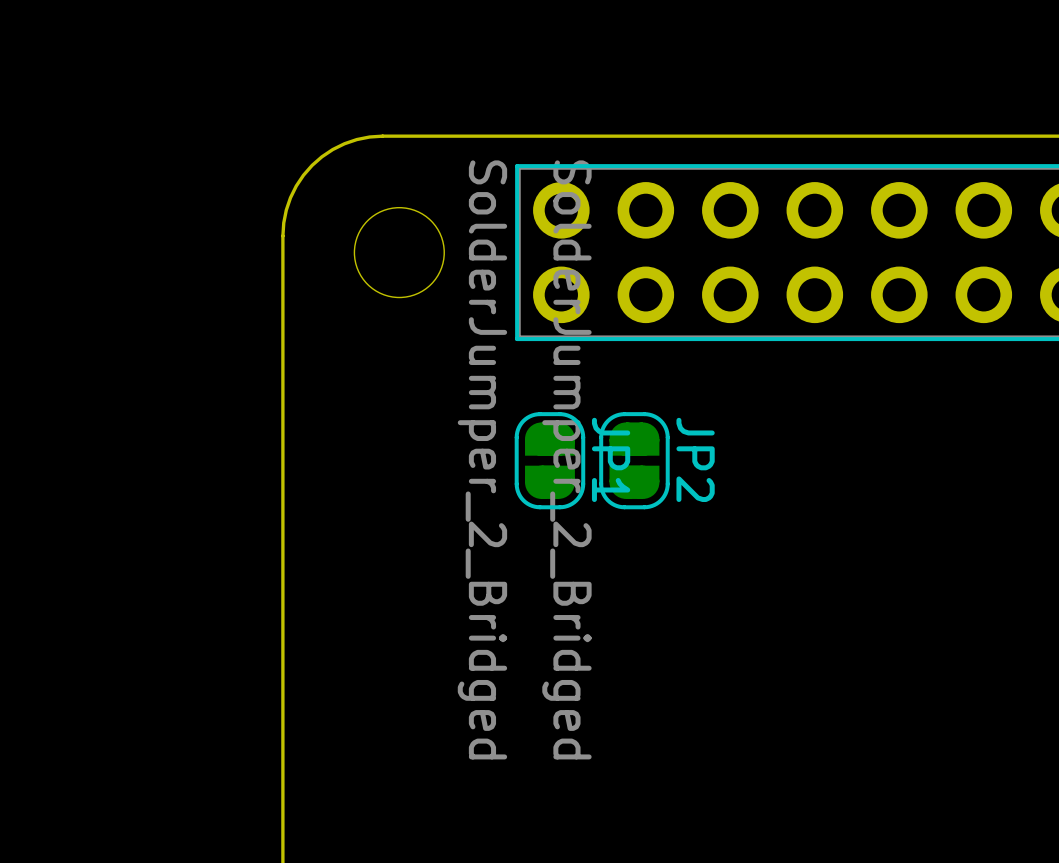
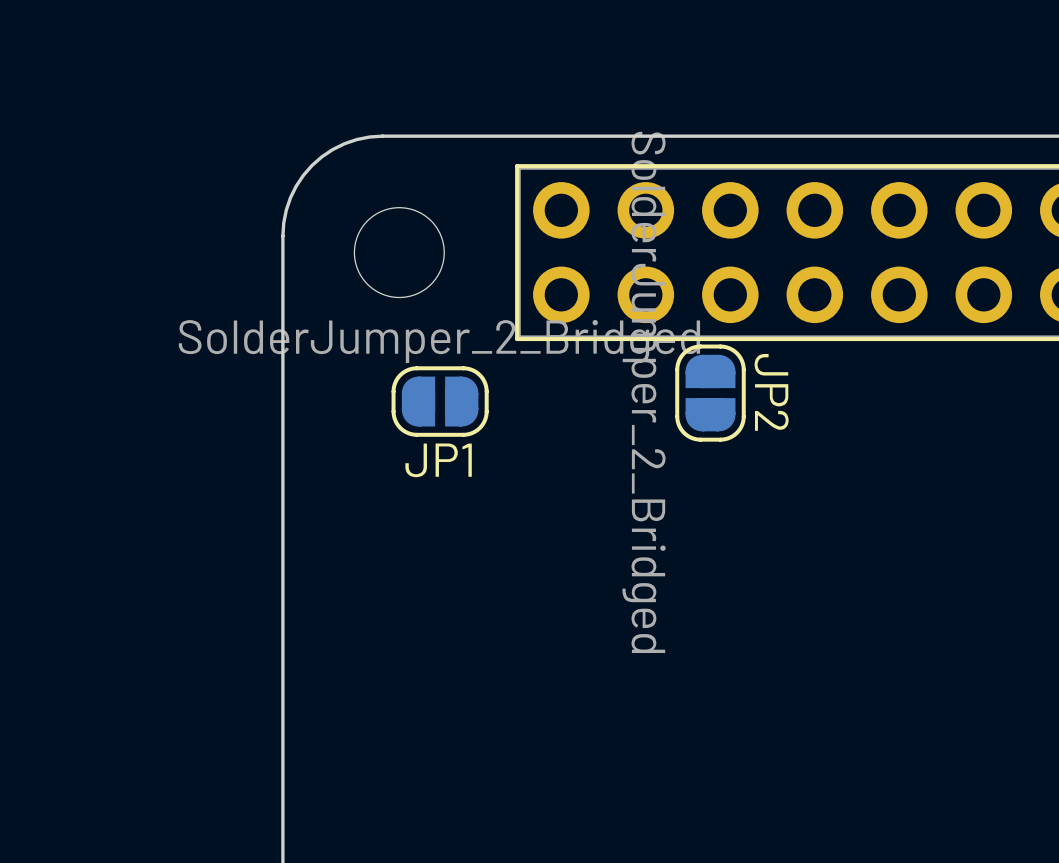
JP1 rotation: 0° (549, 460) -> 90° clockwise (440, 401)
JP1 position: (549, 460) -> (440, 401)
JP2 position: (634, 460) -> (710, 393)

